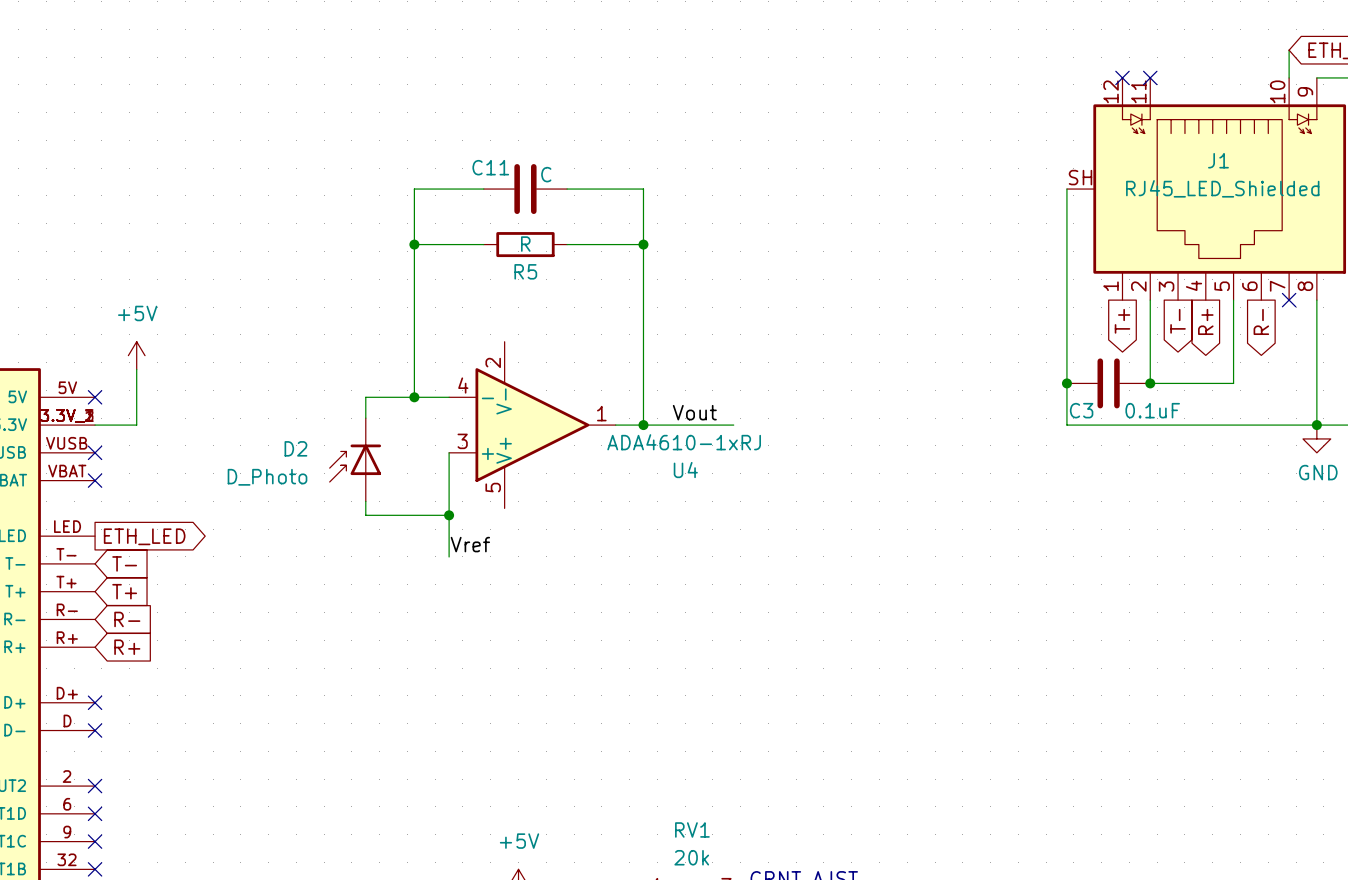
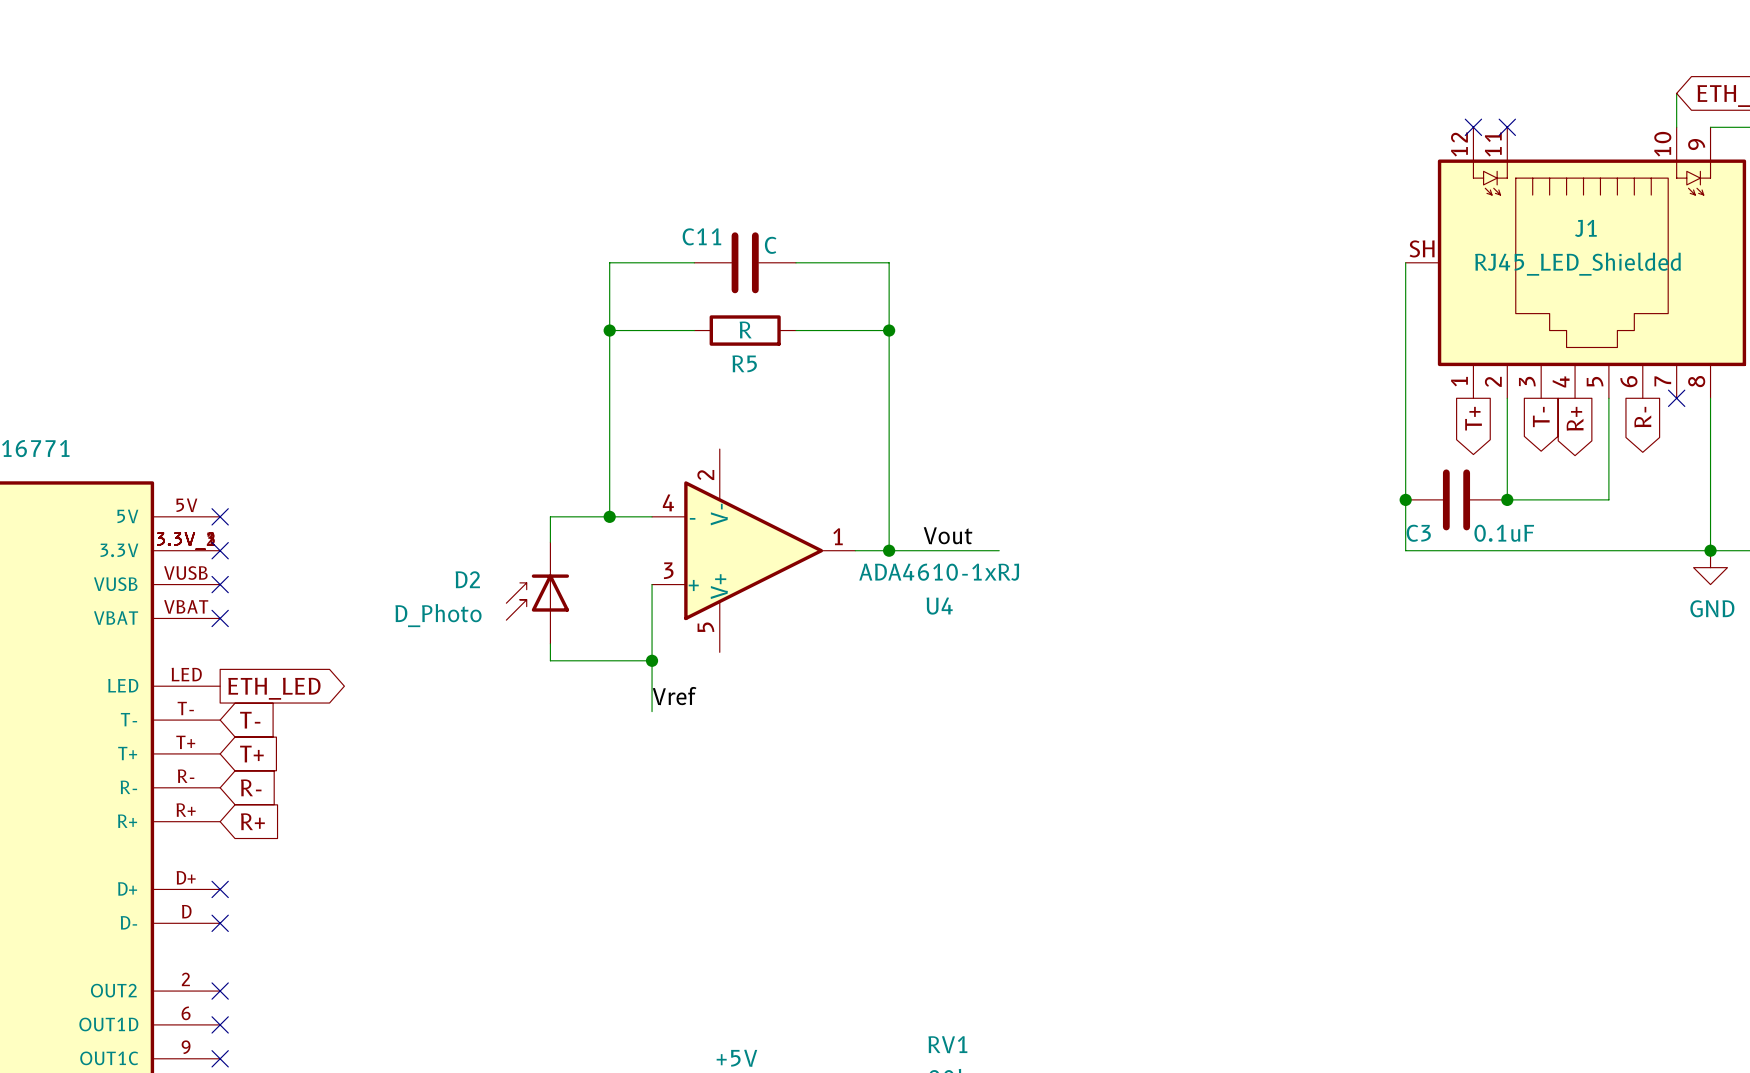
power symbol: +5V (136, 355) -> none
wire: (136, 369) (136, 425) (95, 425) -> none
no-connect mark: none -> (220, 550)

